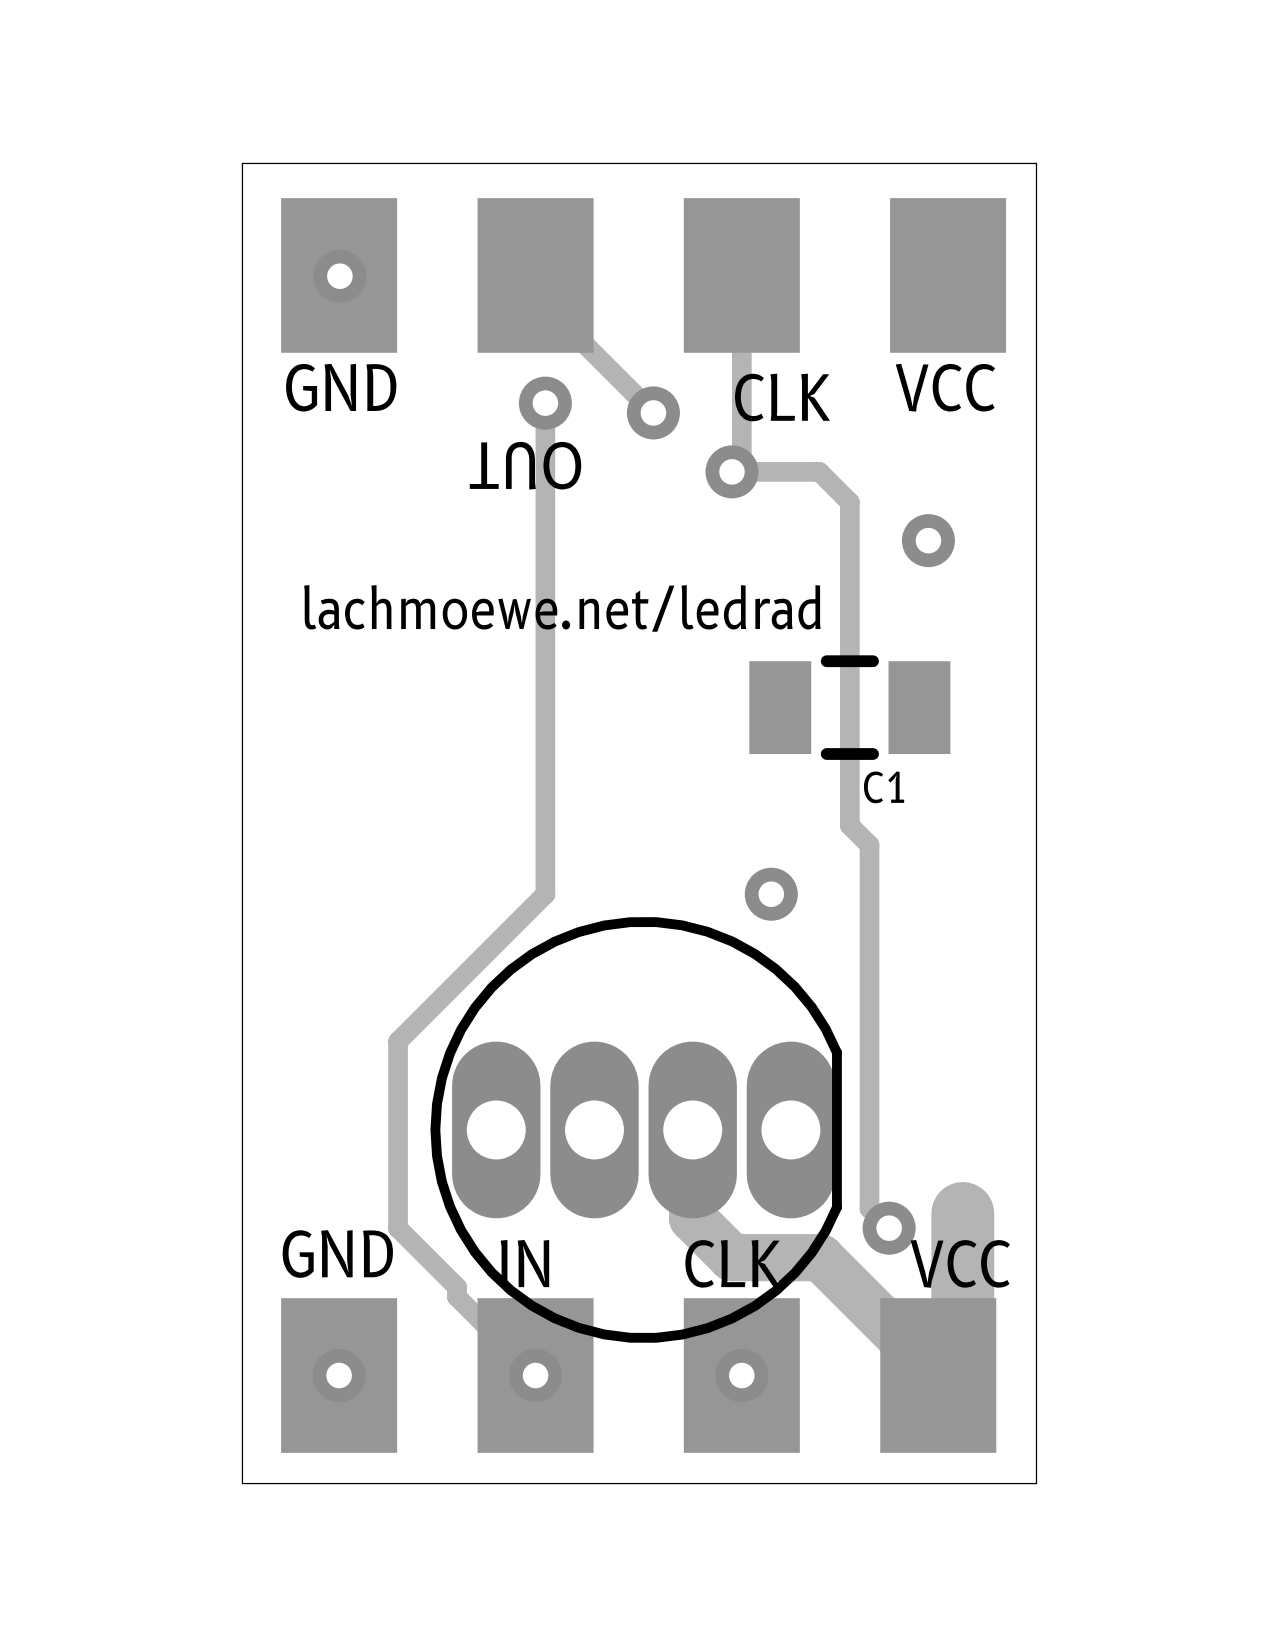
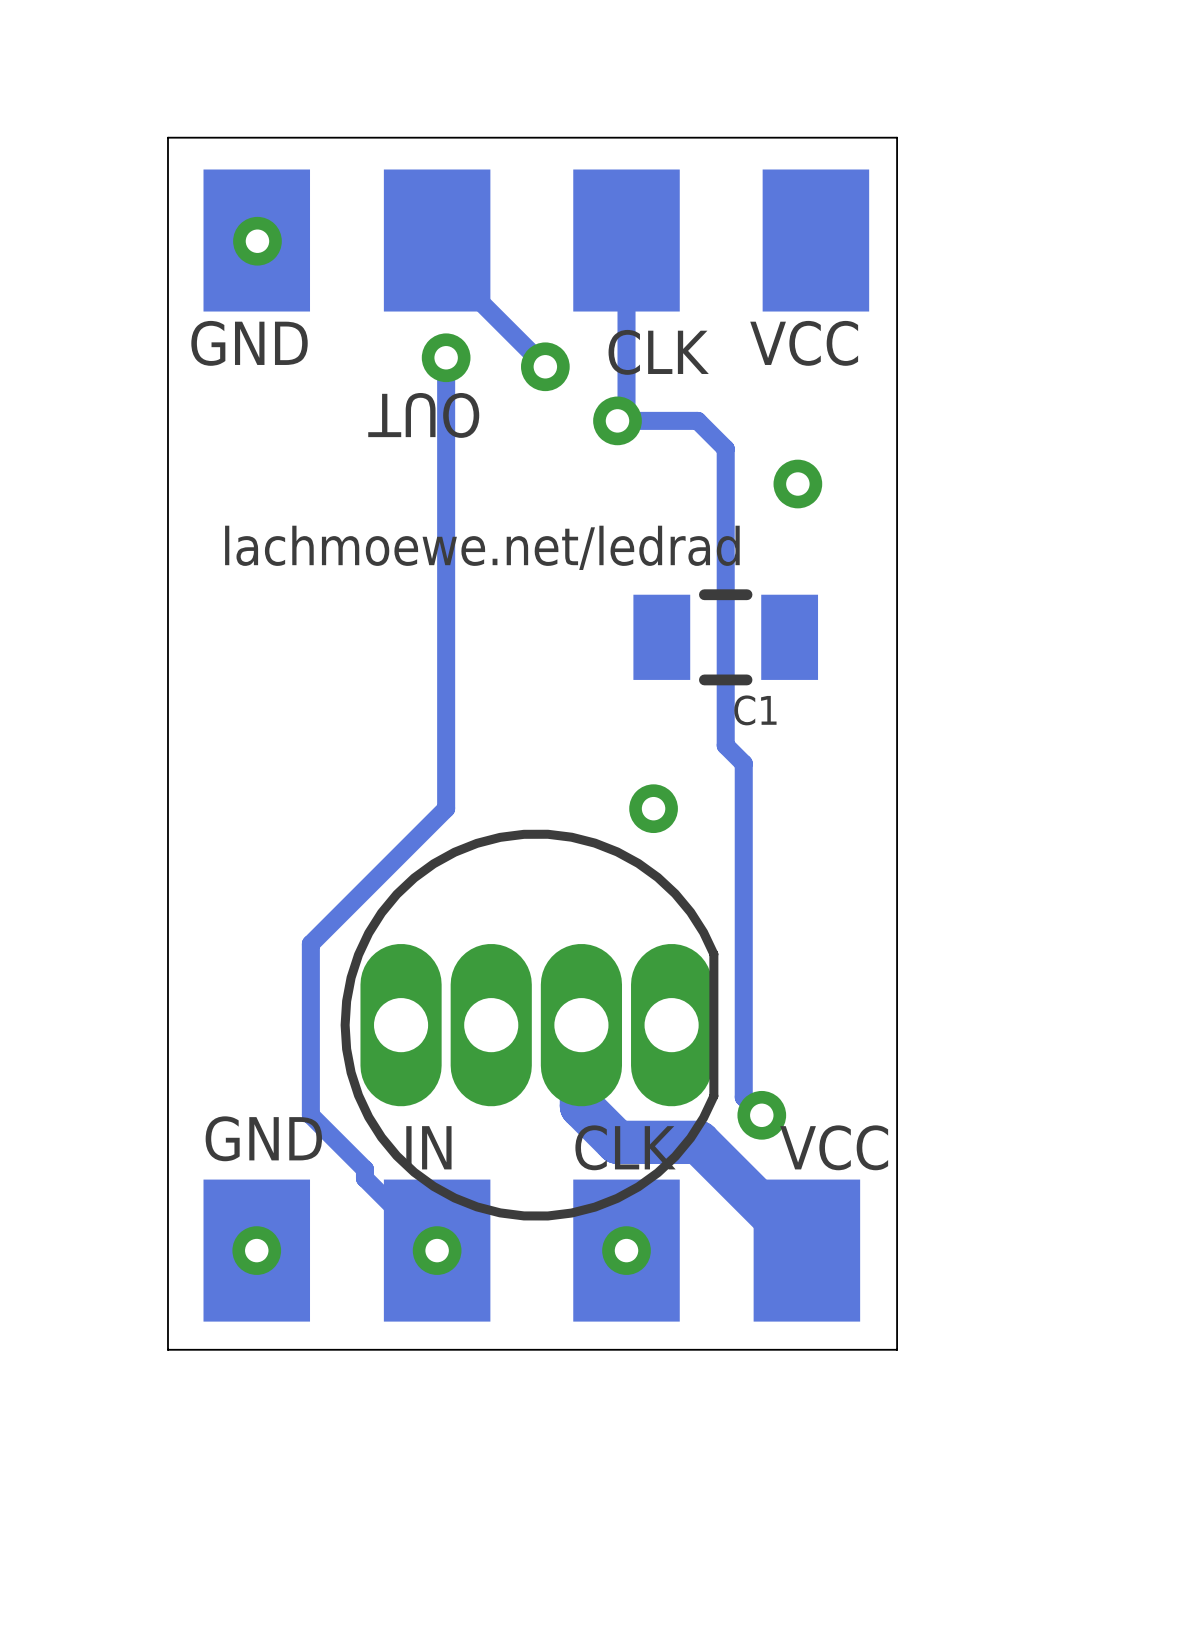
track: (962, 1213) (962, 1375) (952, 1385) -> none

